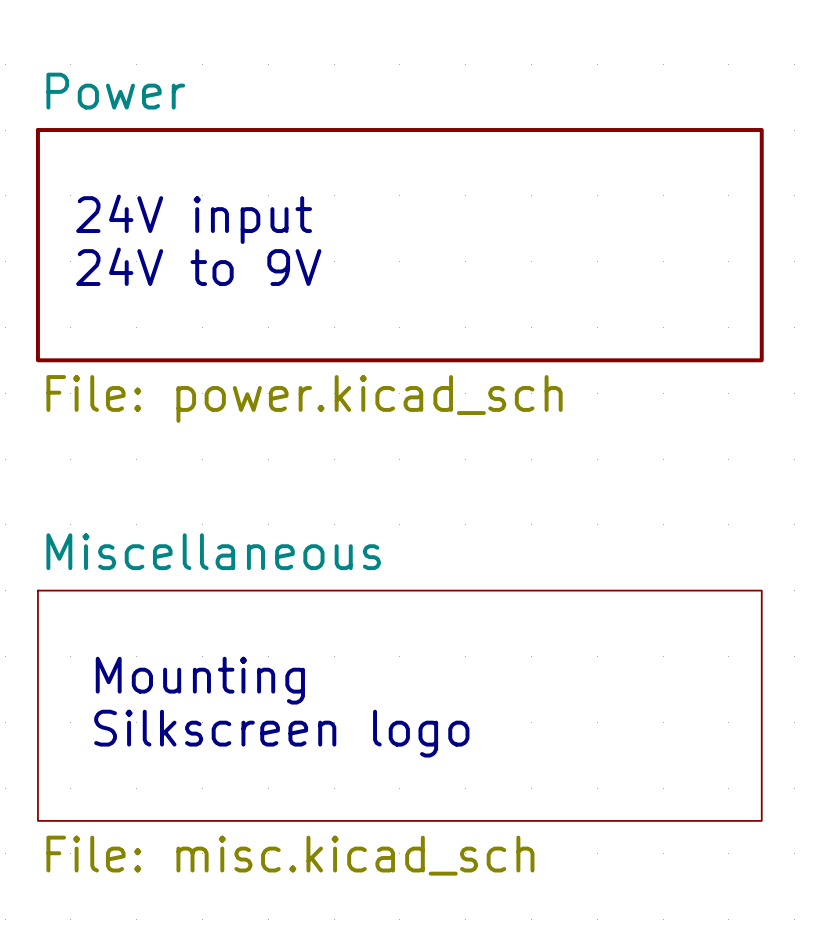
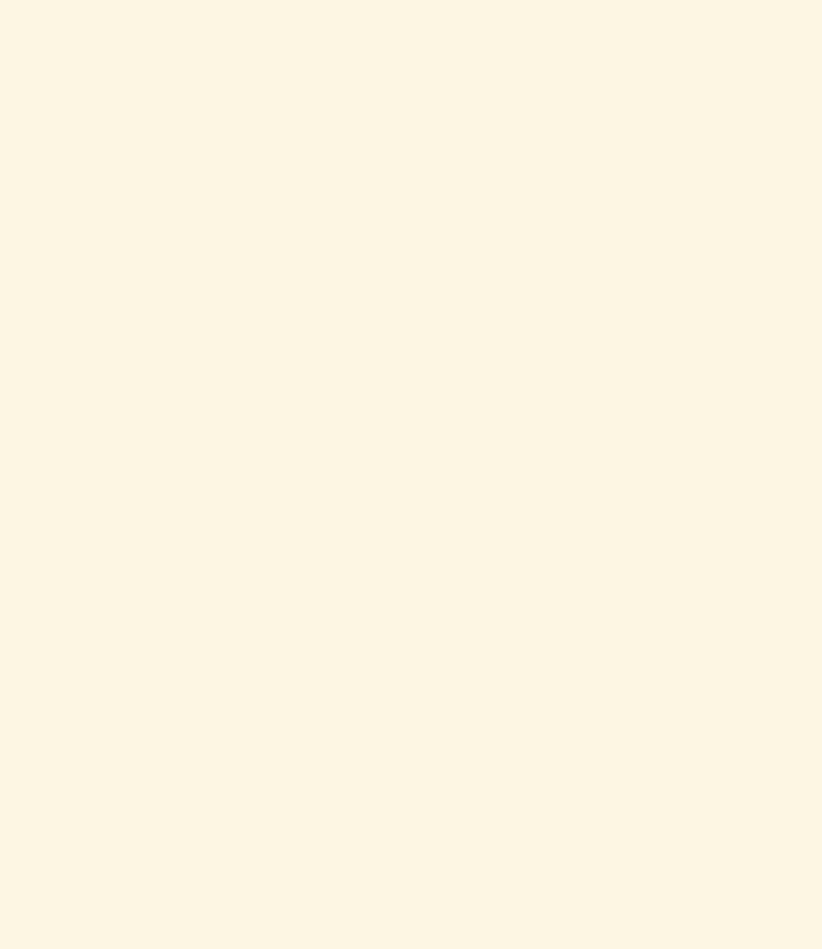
text: 24V input (194, 219) -> none
sheet Power: File: power.kicad_sch (399, 245) -> none
text: 24V to 9V (198, 266) -> none
text: Mounting (200, 680) -> none
sheet Miscellaneous: File: misc.kicad_sch (399, 705) -> none
text: Silkscreen logo (281, 733) -> none

